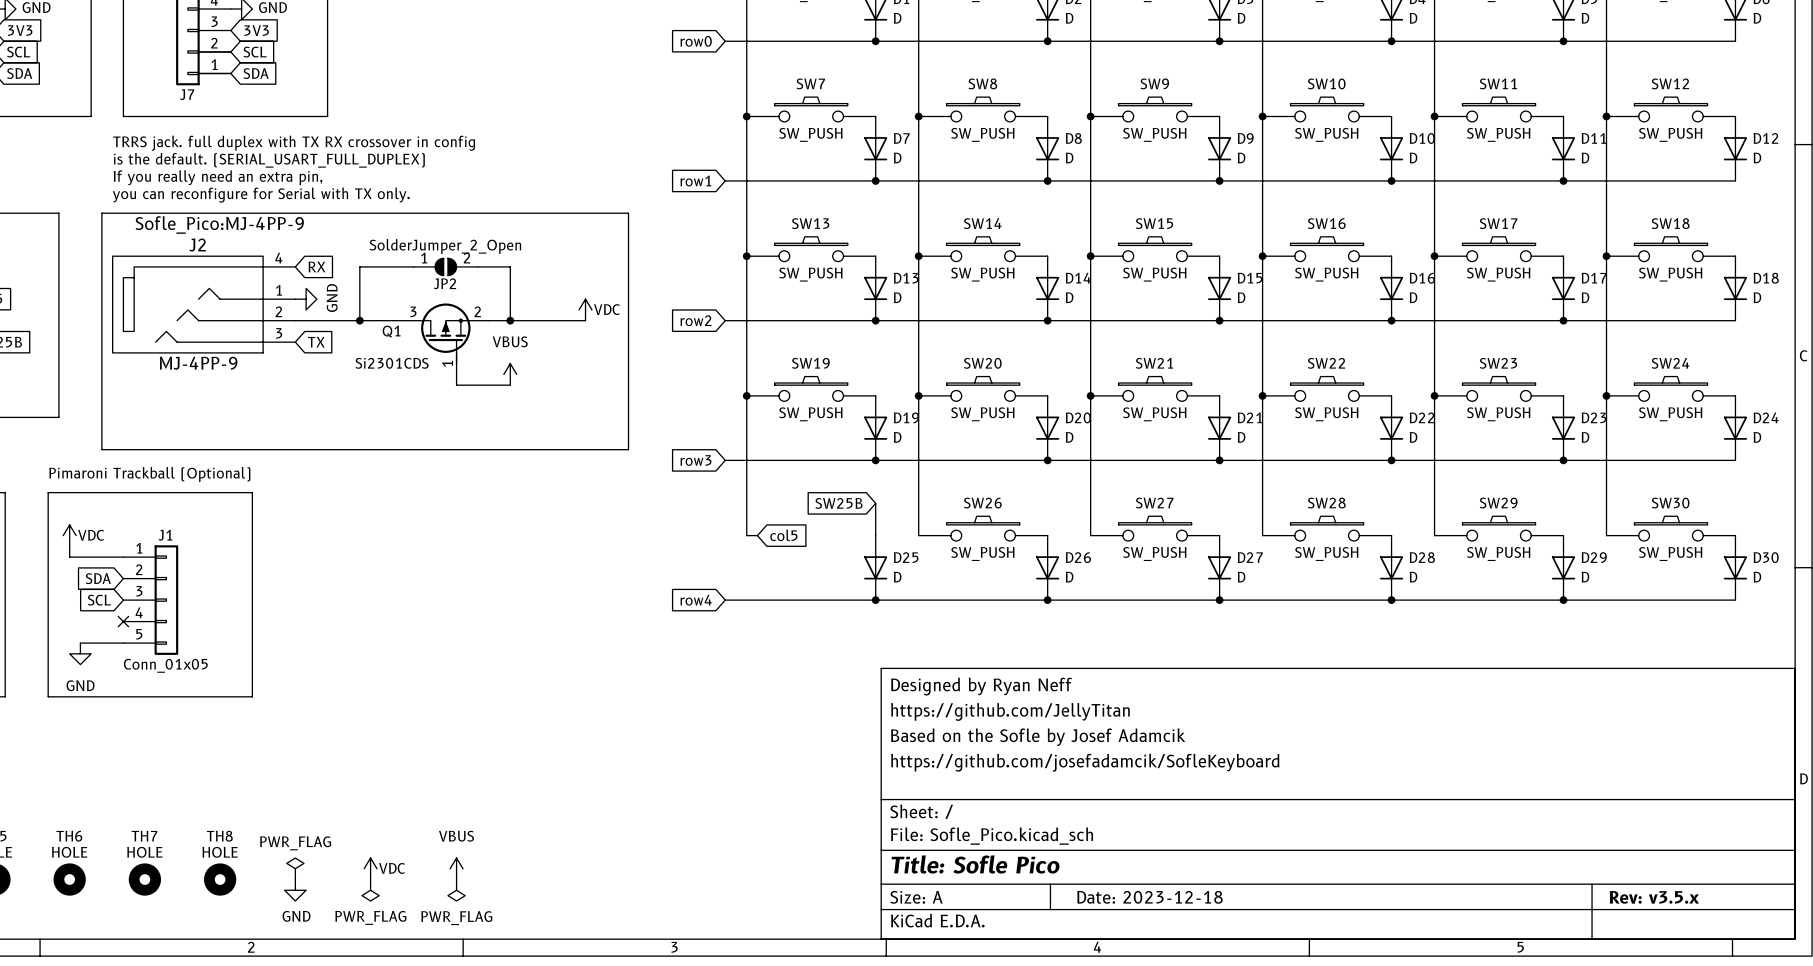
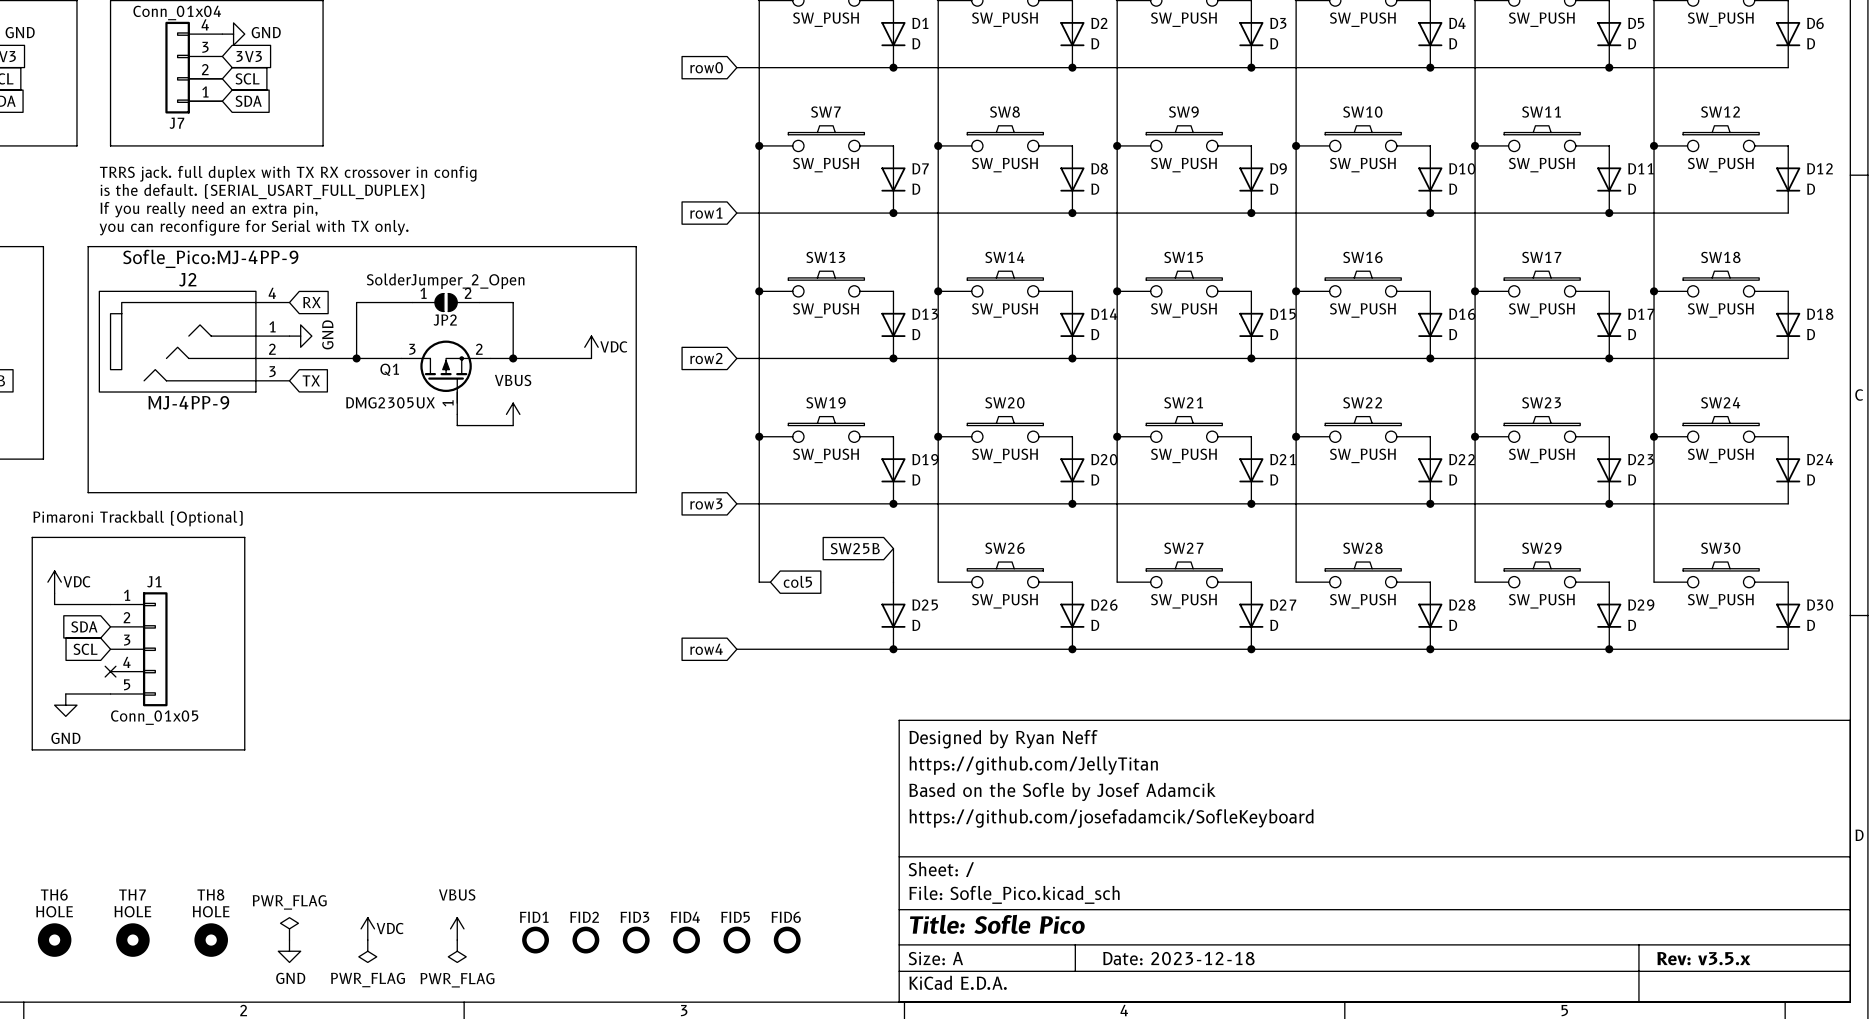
Q1 value: Si2301CDS (392, 363) -> DMG2305UX (390, 402)
FID1: none -> (535, 940)
FID2: none -> (585, 940)
FID3: none -> (636, 940)
FID4: none -> (686, 940)
FID5: none -> (736, 940)
FID6: none -> (787, 940)

